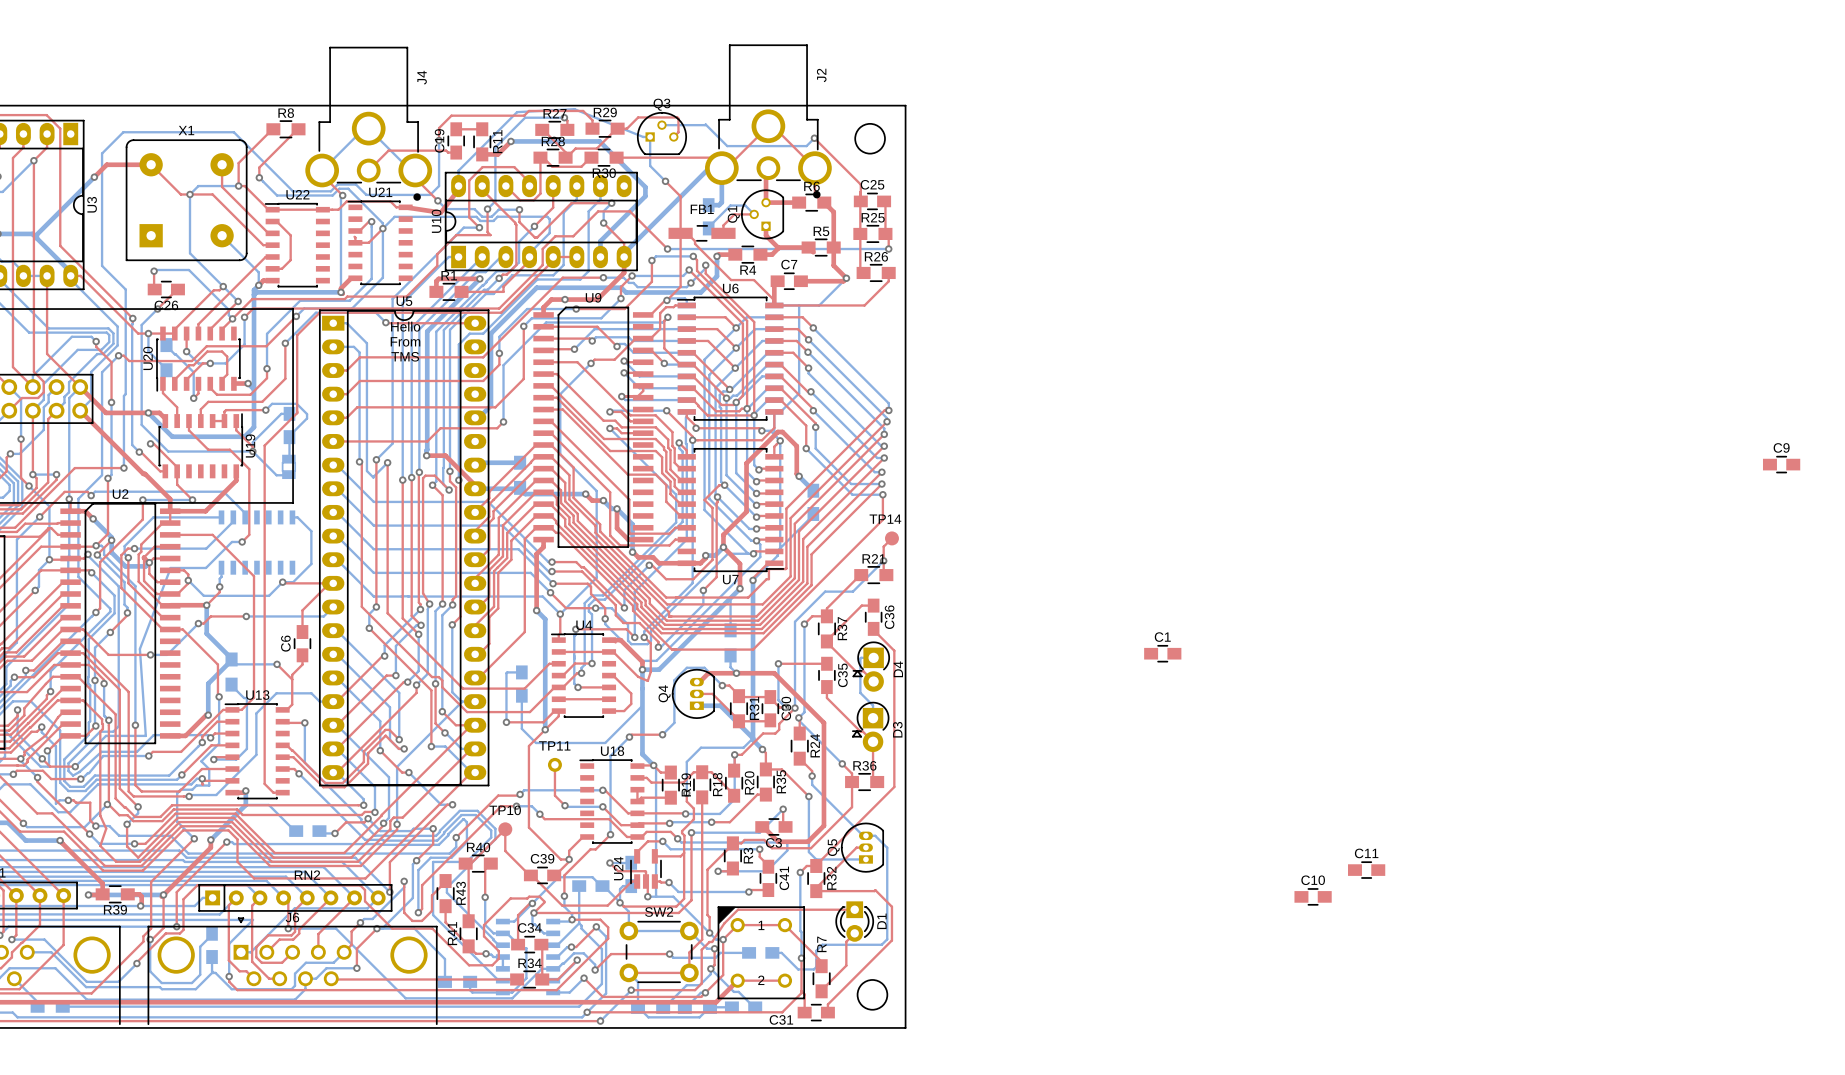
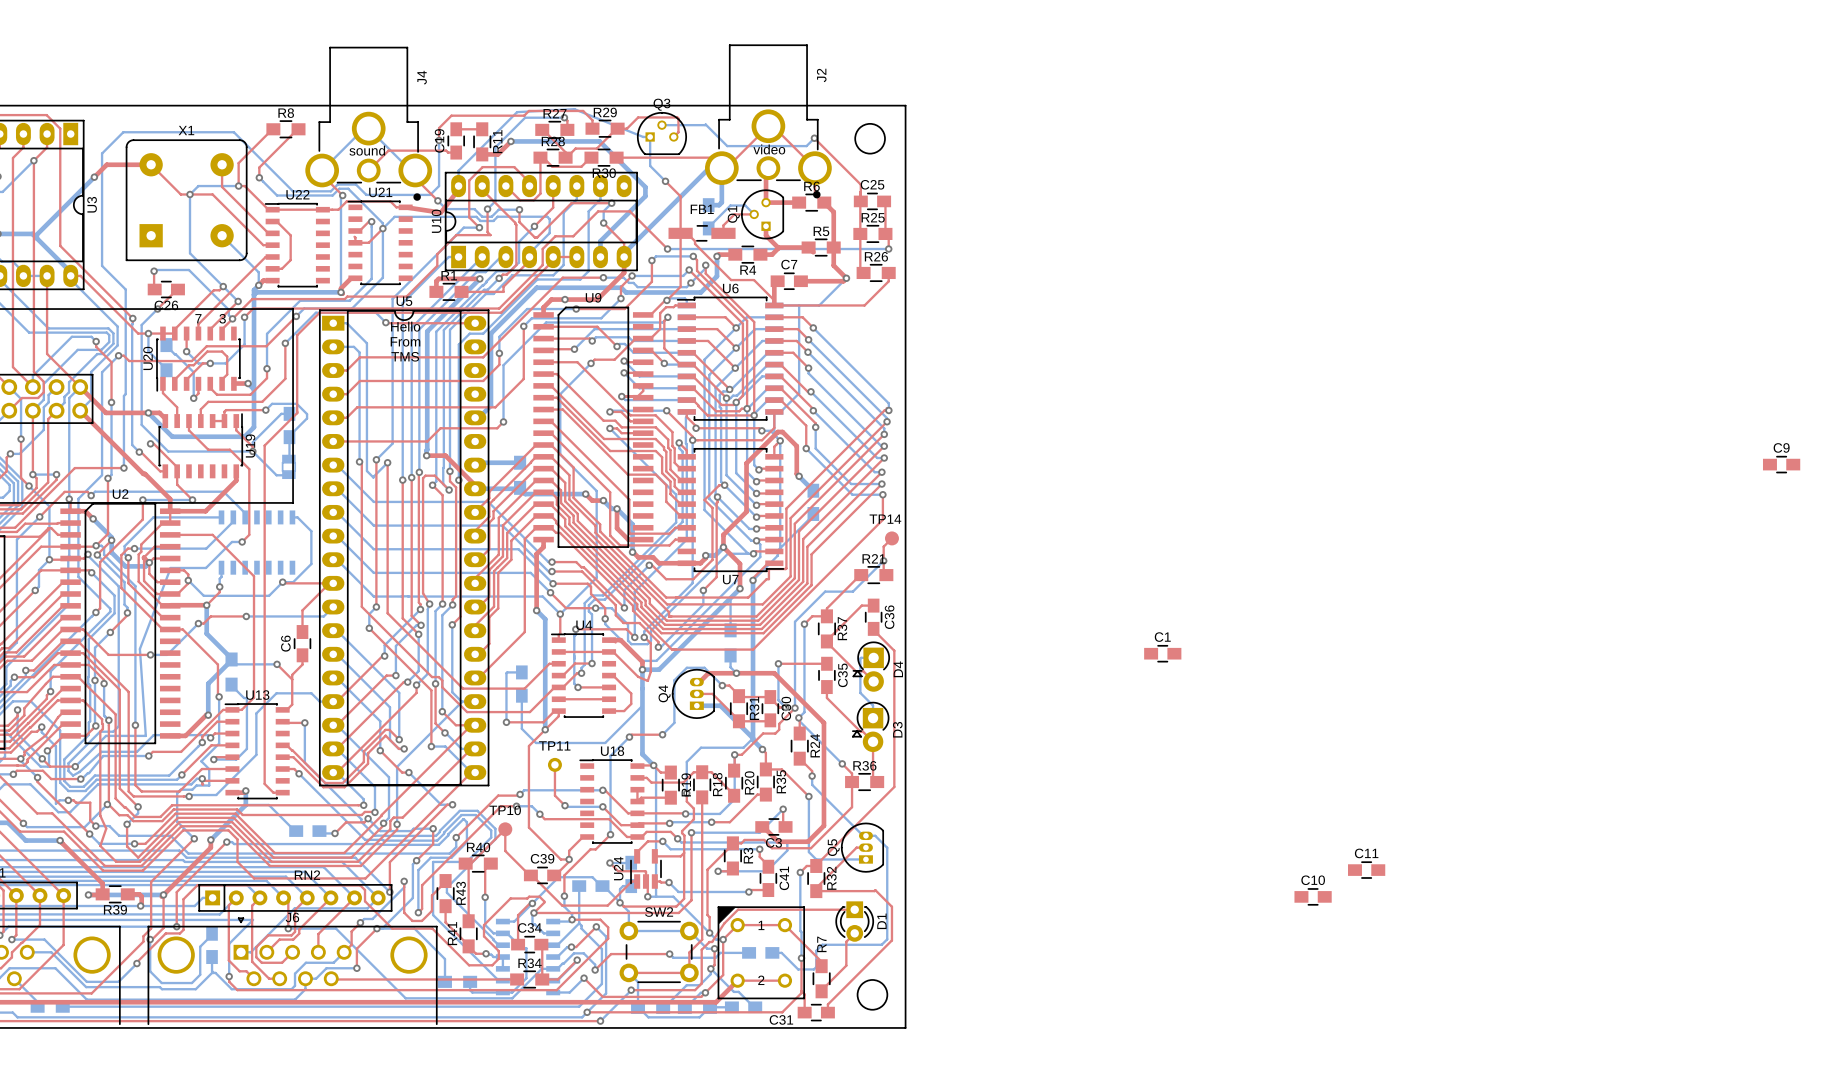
text: none -> video (769, 149)
text: none -> sound (367, 150)
text: none -> 7 (198, 318)
text: none -> 3 (222, 318)

